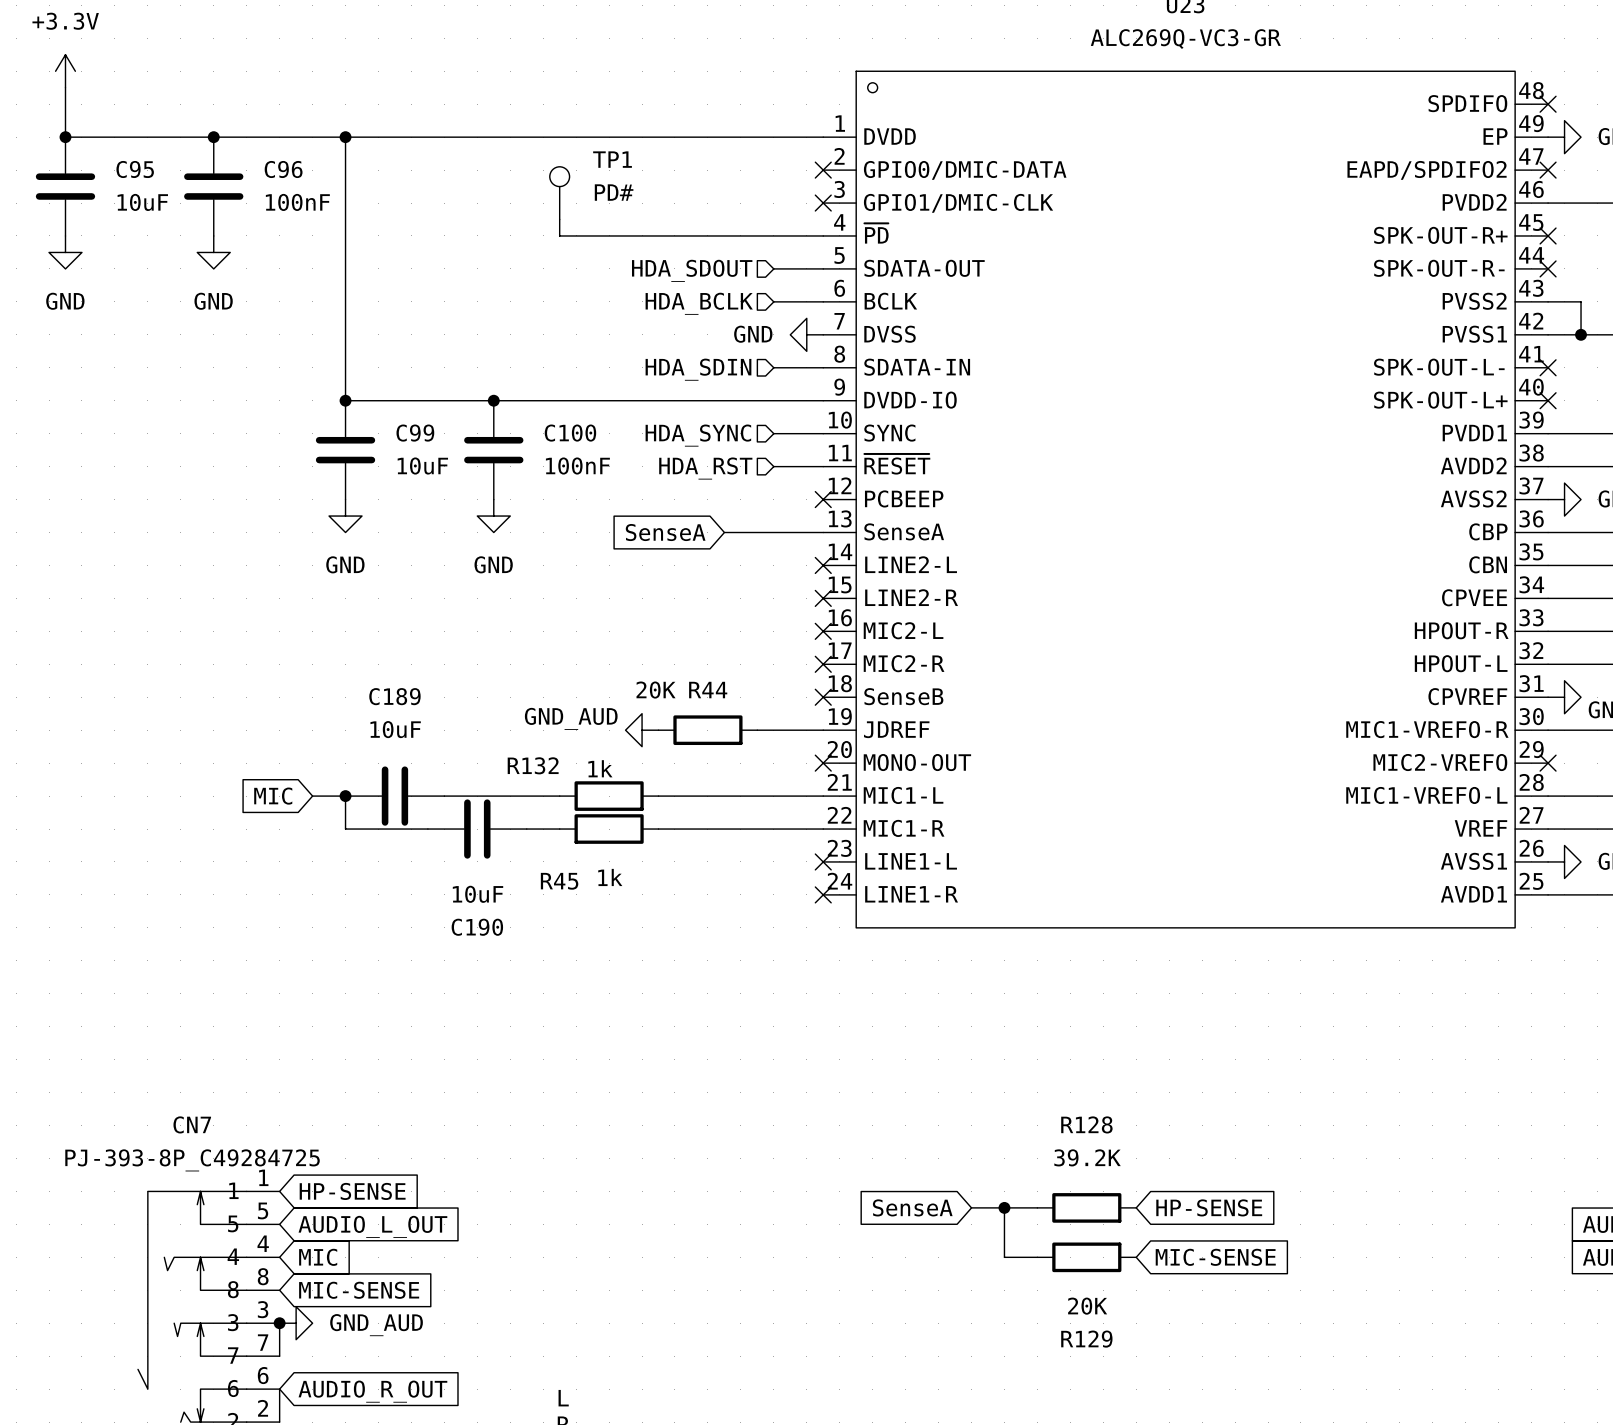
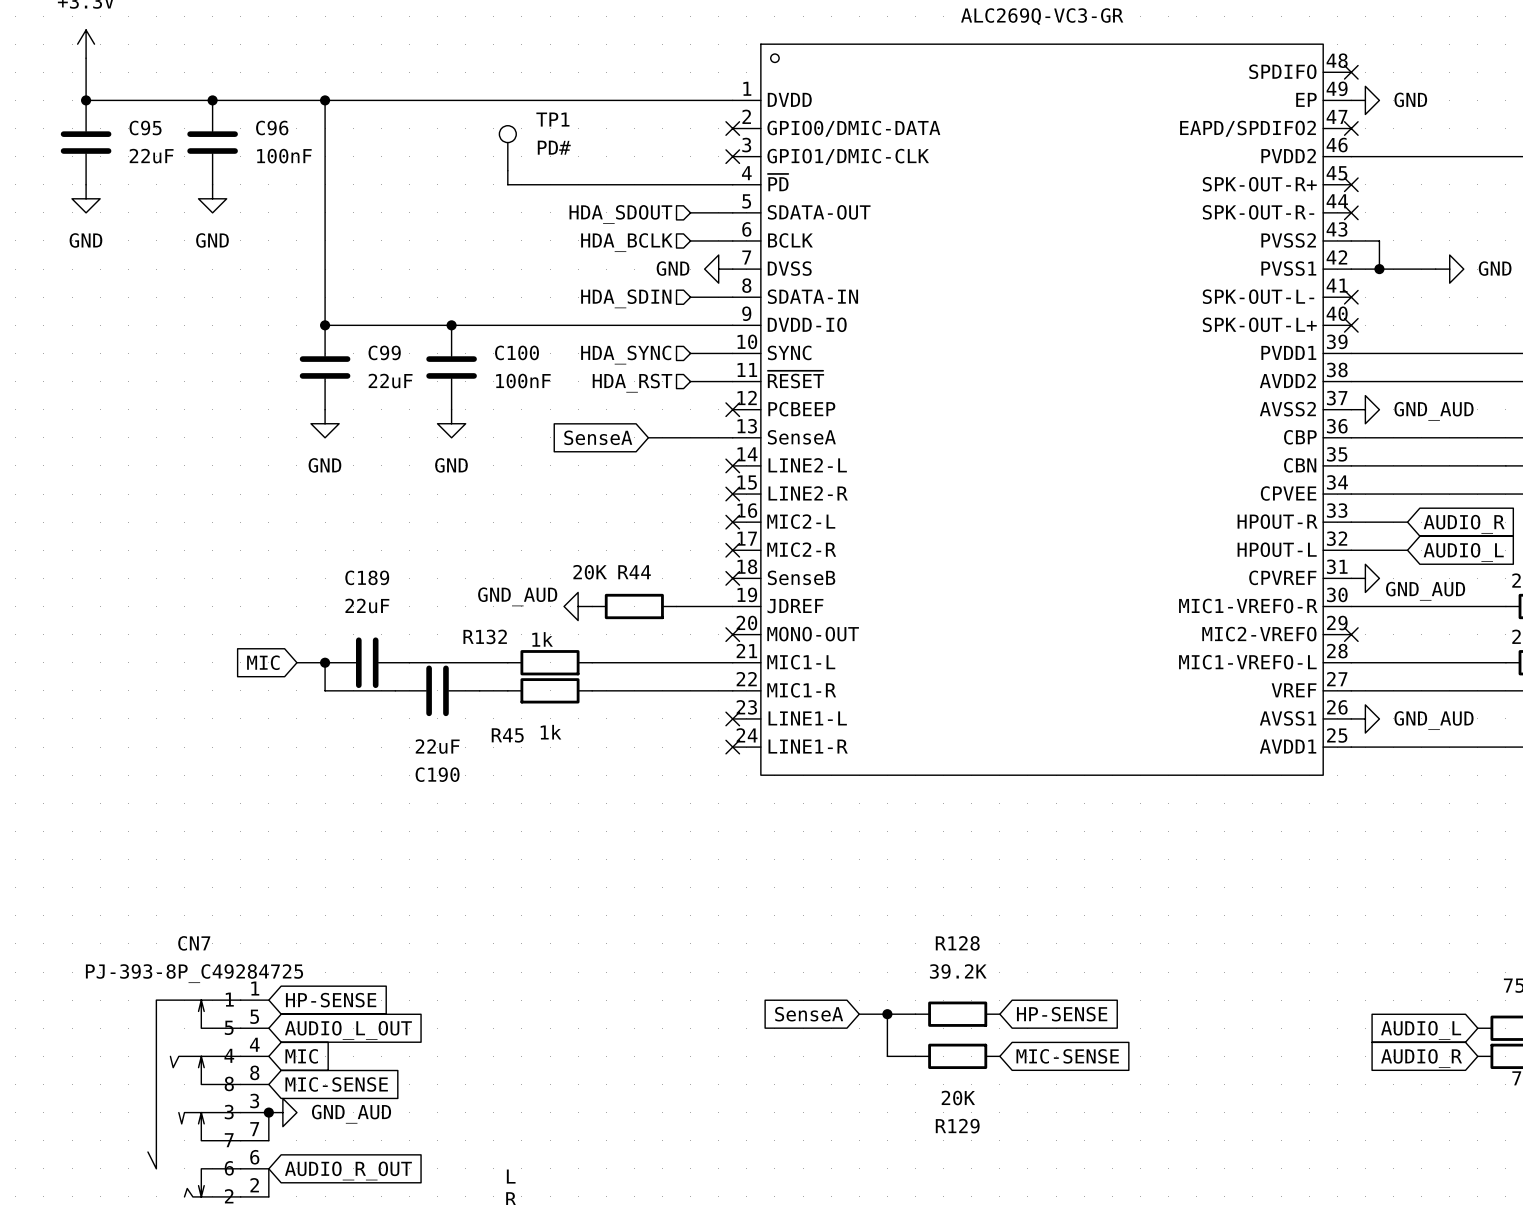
C95 value: 10uF (142, 202) -> 22uF (151, 156)
C99 value: 10uF (422, 466) -> 22uF (390, 381)
C189 value: 10uF (395, 729) -> 22uF (367, 605)
C190 value: 10uF (478, 894) -> 22uF (437, 746)

